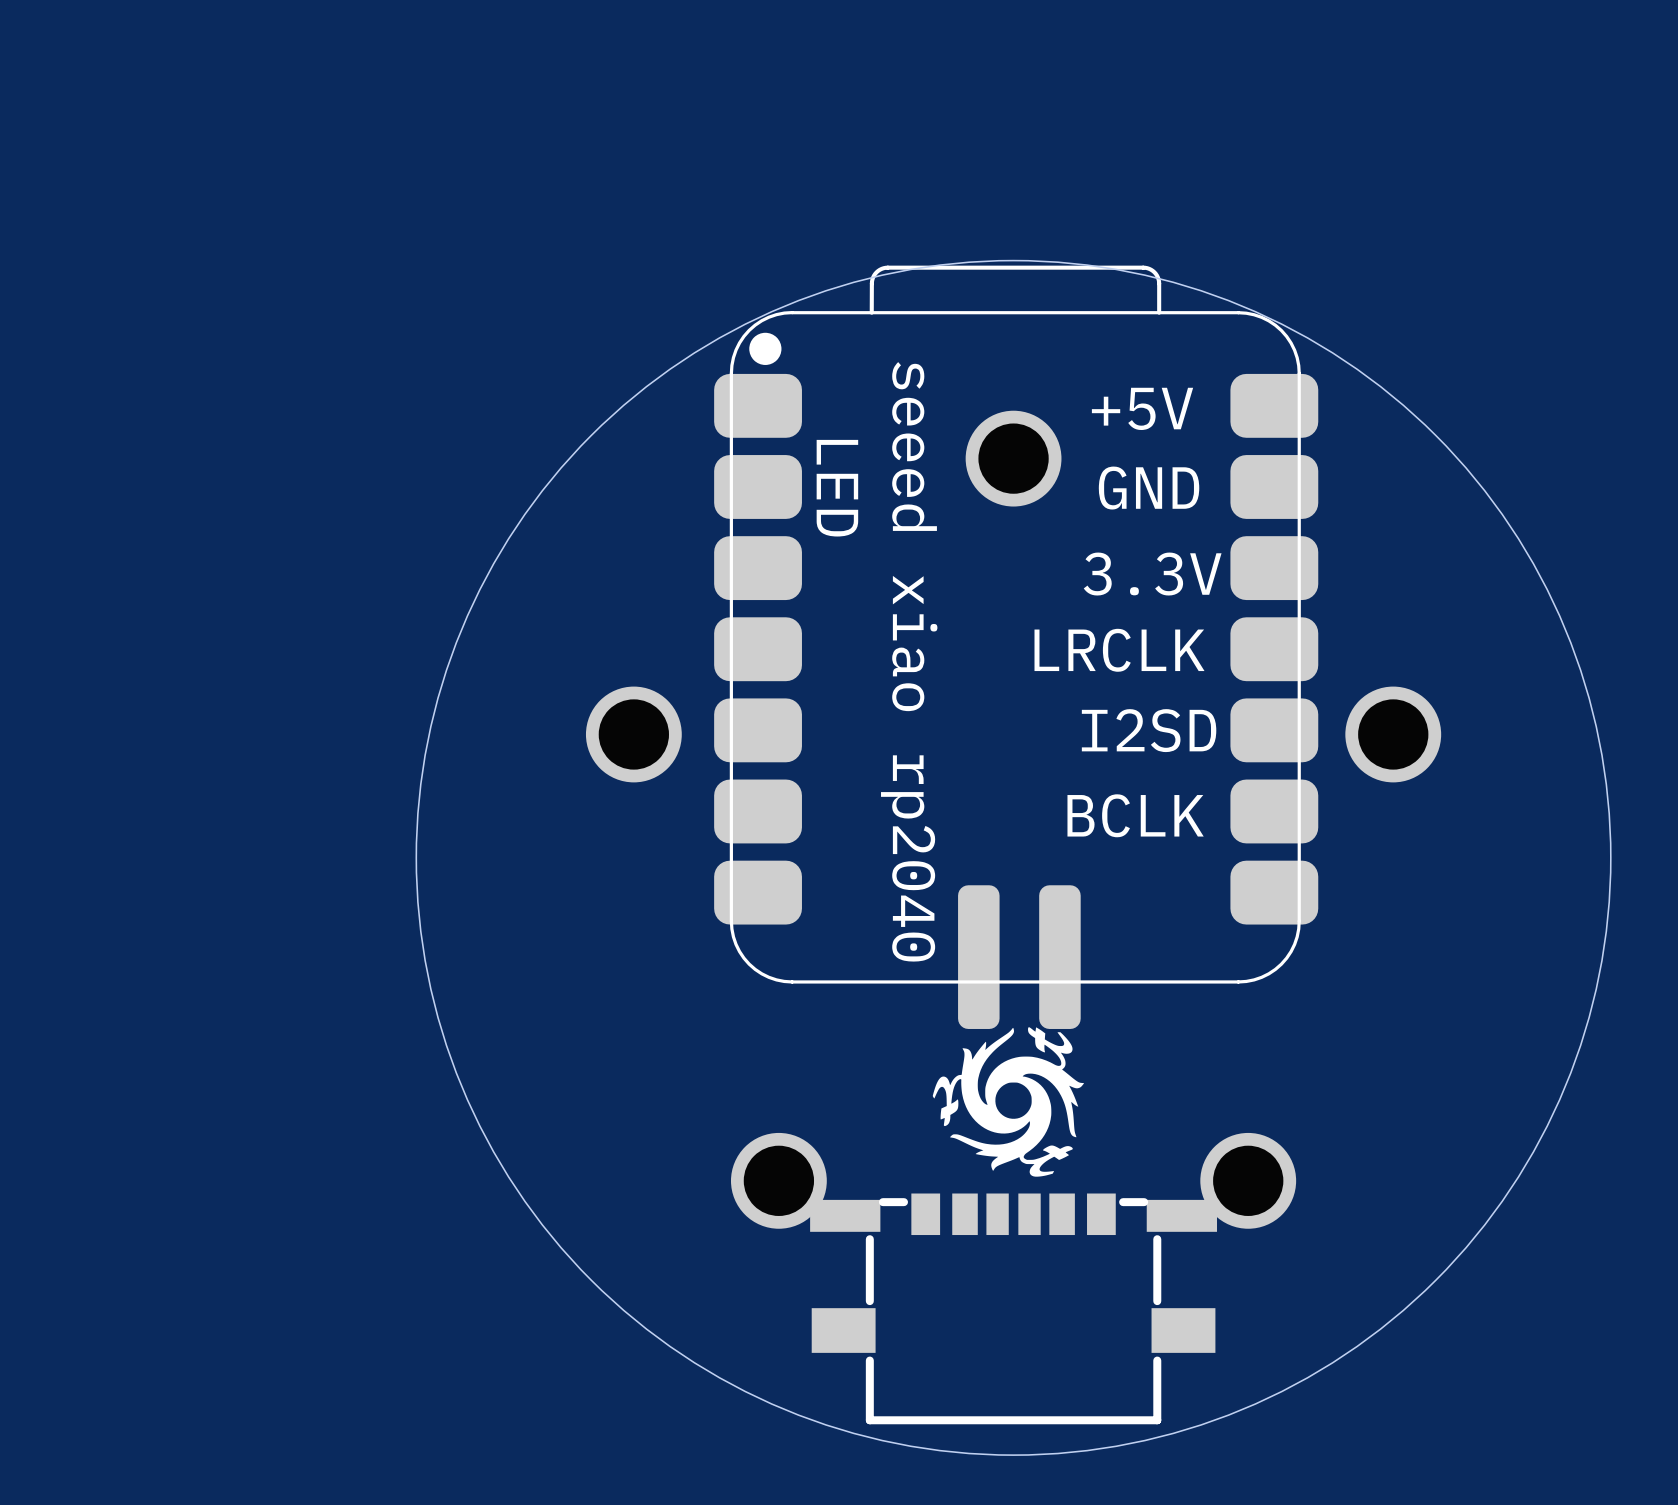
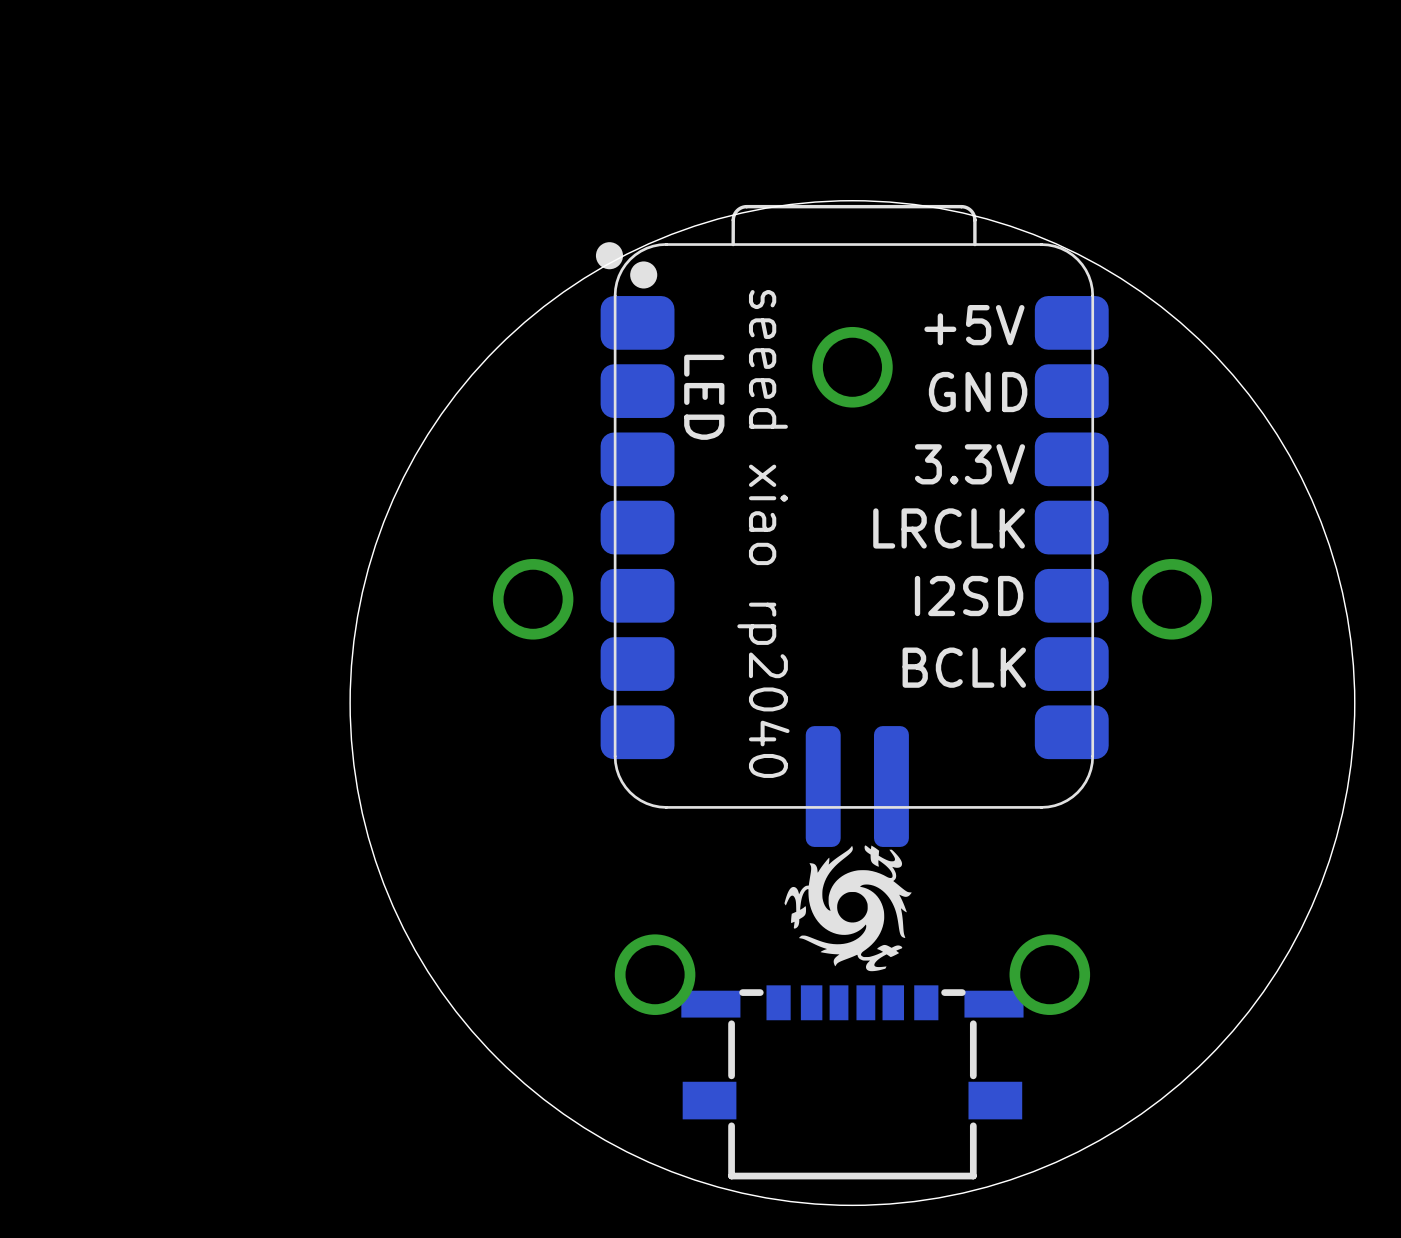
part footprint: [714, 265, 1319, 1029] -> [595, 204, 1109, 847]

